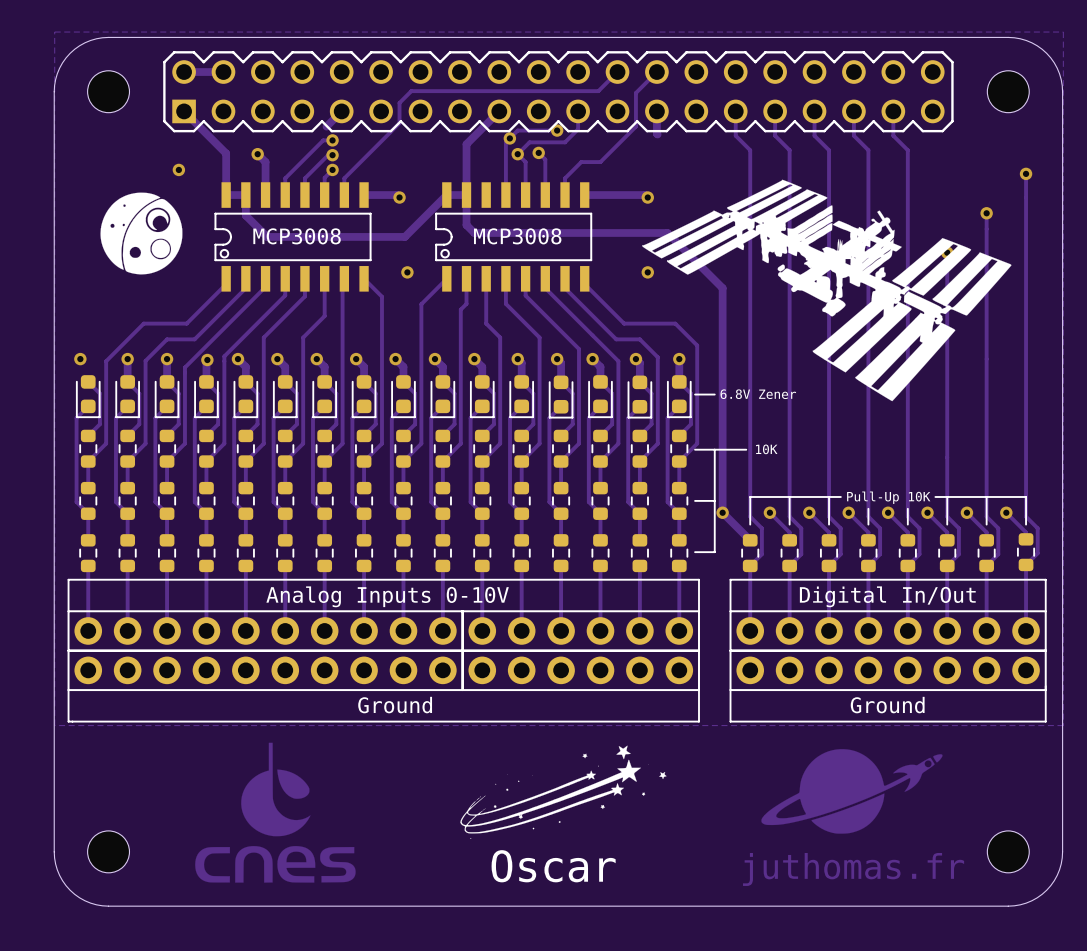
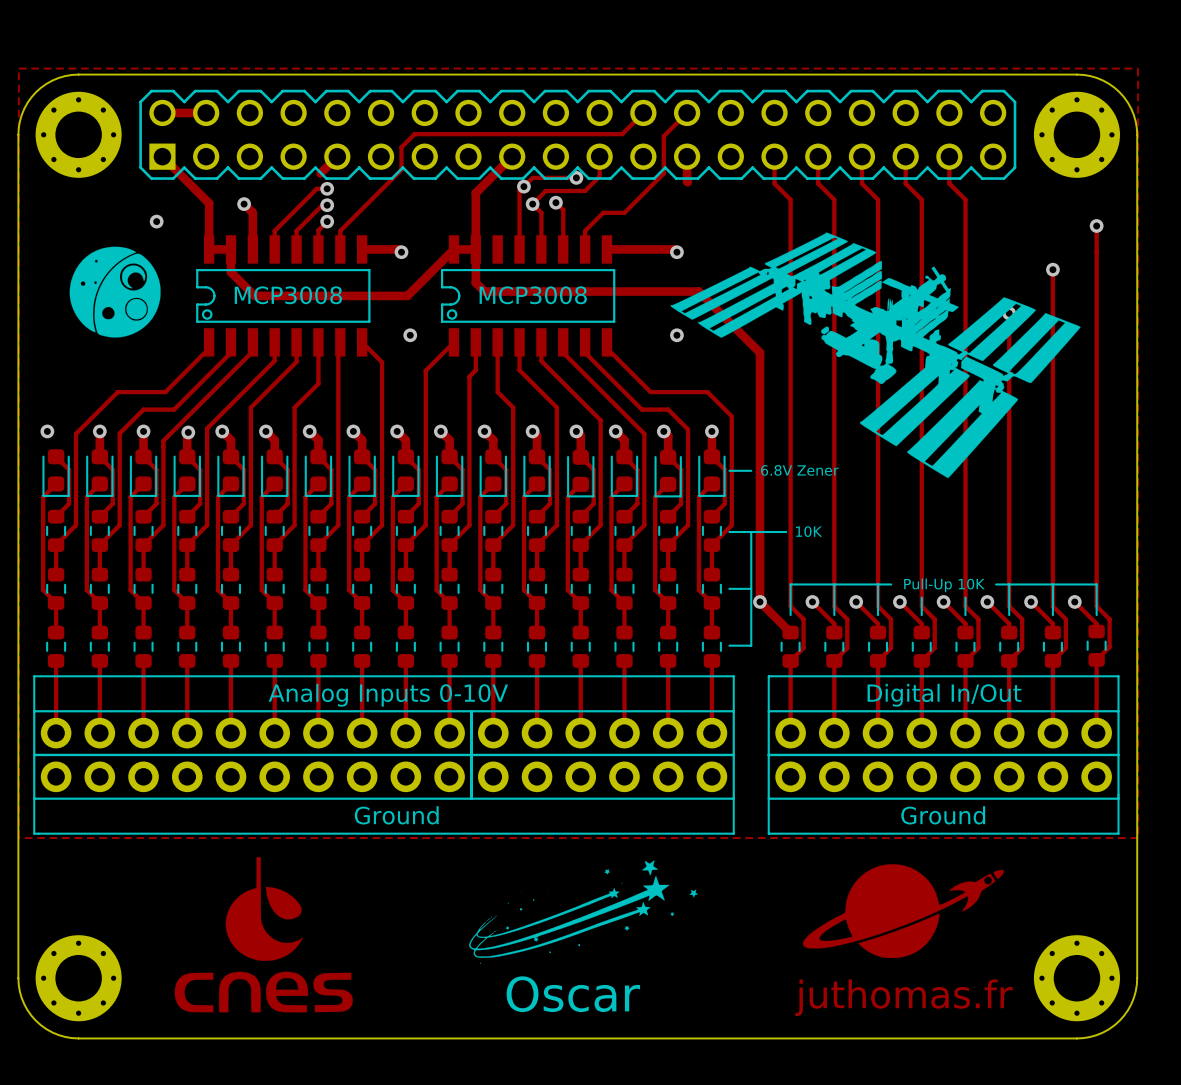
part footprint: [87, 70, 130, 113] -> [35, 91, 122, 178]
part footprint: [987, 70, 1030, 113] -> [1033, 91, 1120, 178]
part footprint: [87, 830, 130, 873] -> [35, 935, 122, 1022]
part footprint: [987, 830, 1030, 873] -> [1033, 935, 1120, 1022]

